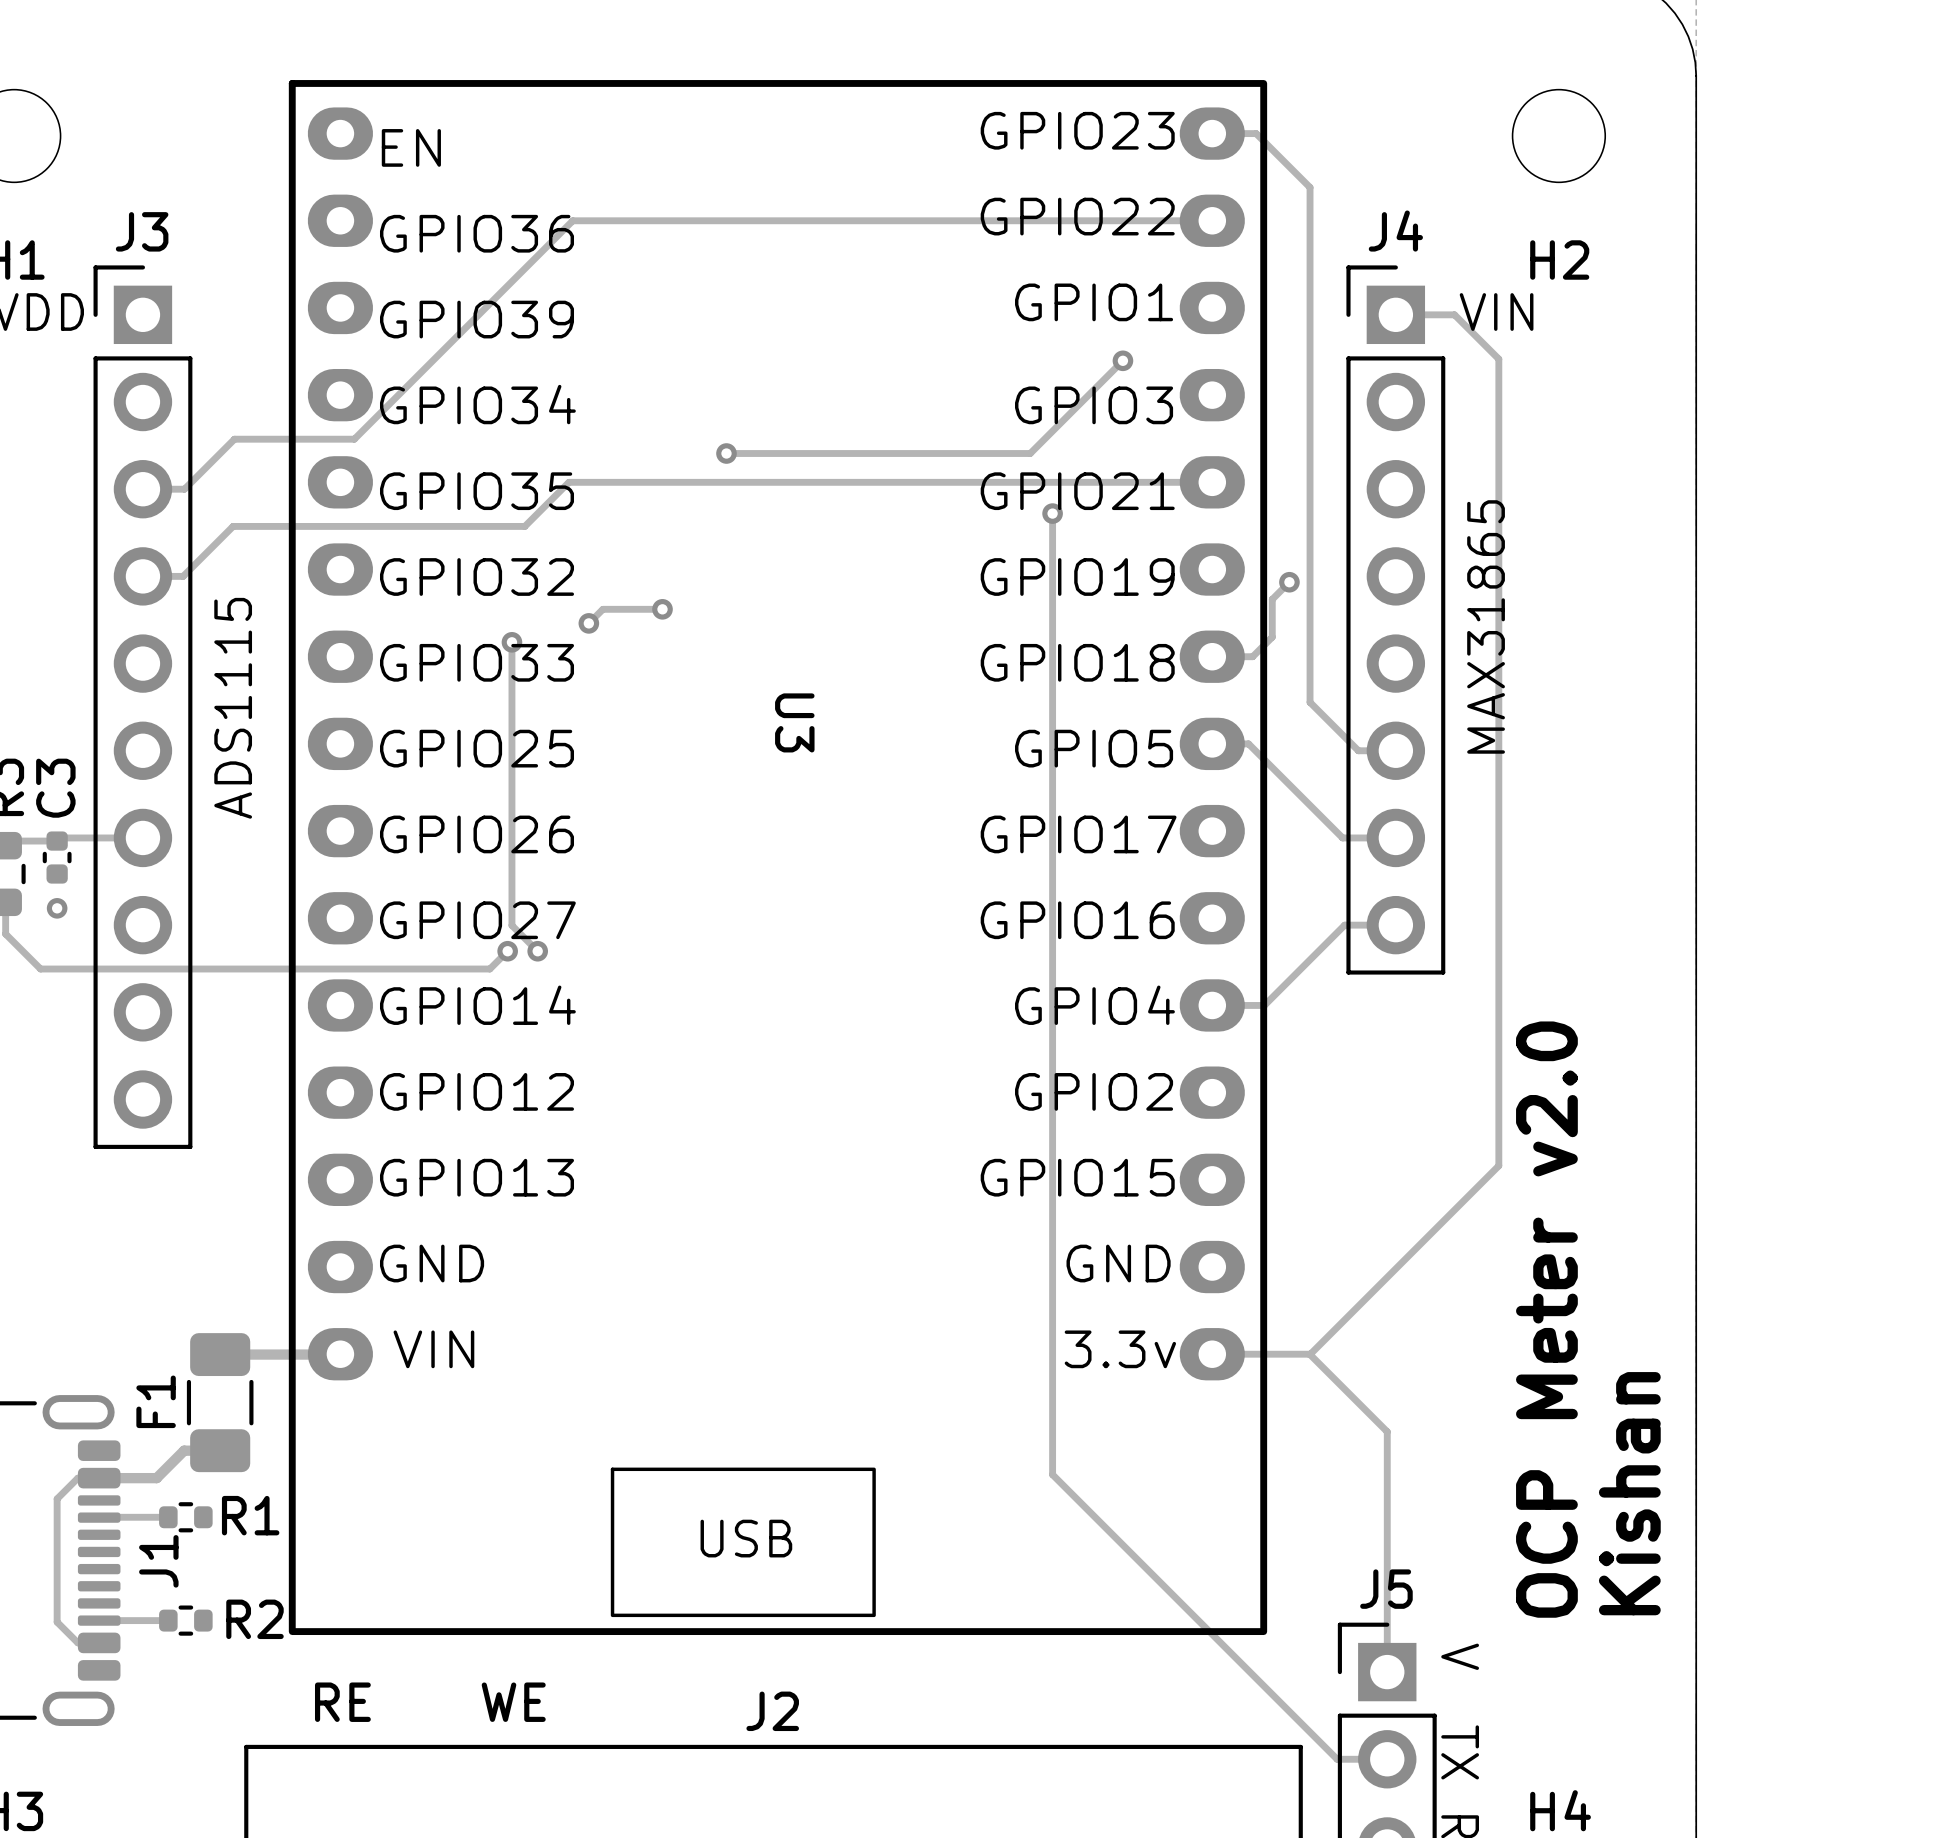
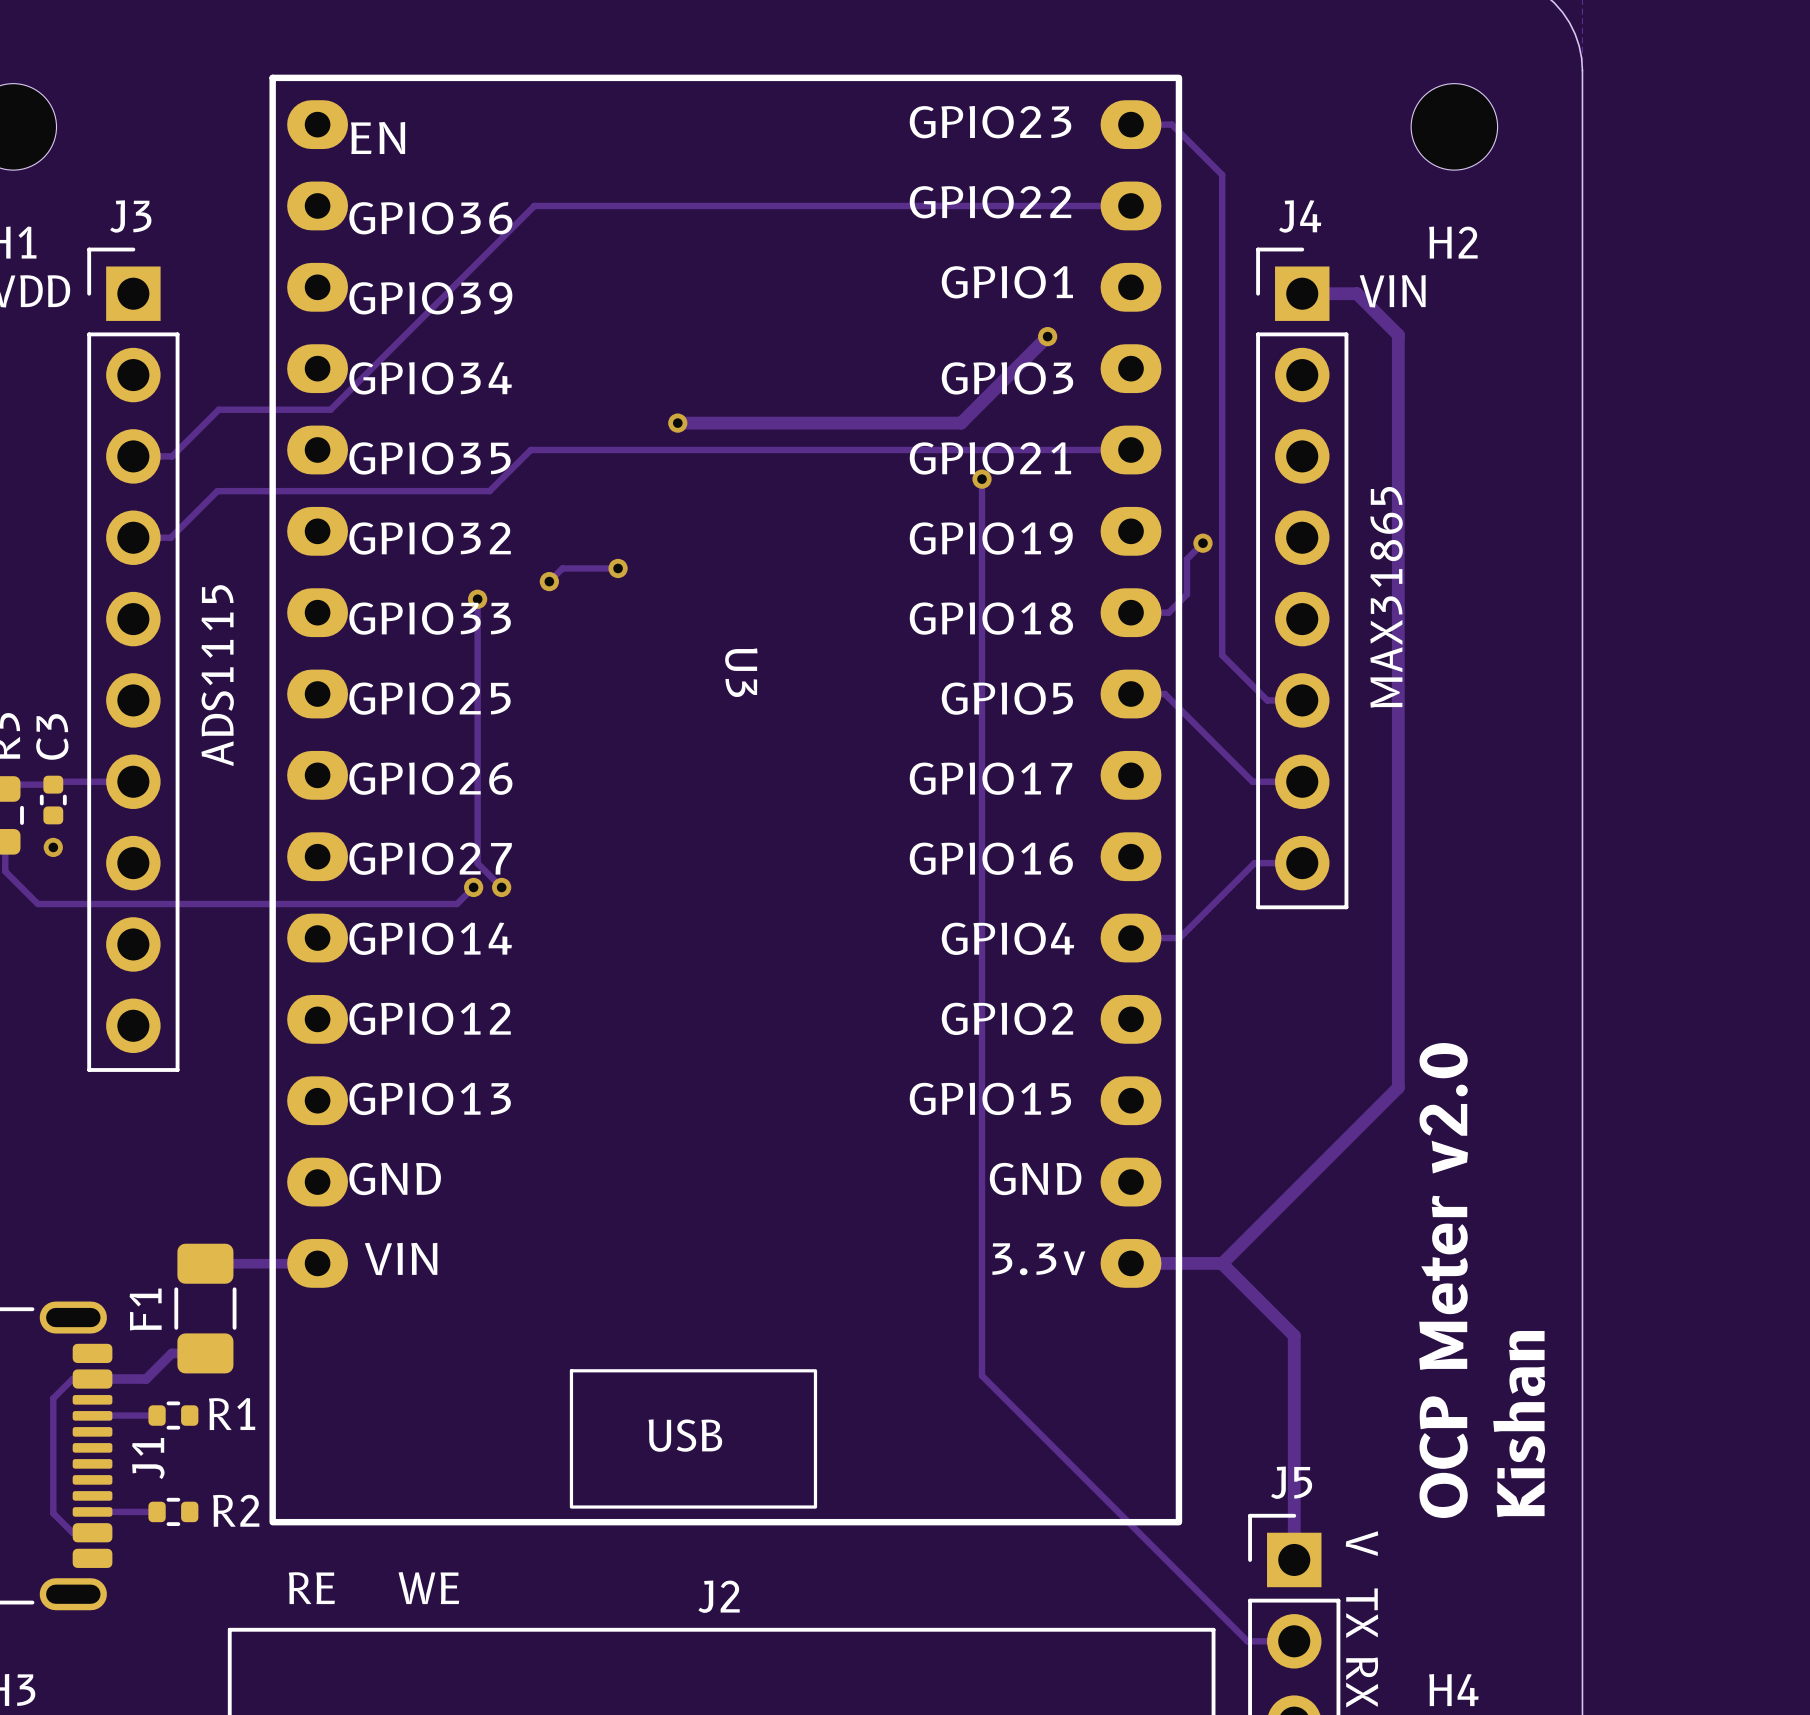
track width: thin (1395, 314) (1454, 314) (1498, 359) (1498, 1165) (1310, 1354) -> thick (1302, 293) (1357, 293) (1398, 335) (1398, 1087) (1222, 1263)
track width: thin (1122, 360) (1030, 453) (726, 453) -> thick (1047, 336) (961, 423) (677, 423)
track width: thin (1212, 1354) (1309, 1354) (1387, 1431) (1387, 1672) -> thick (1131, 1263) (1221, 1263) (1294, 1335) (1294, 1559)

